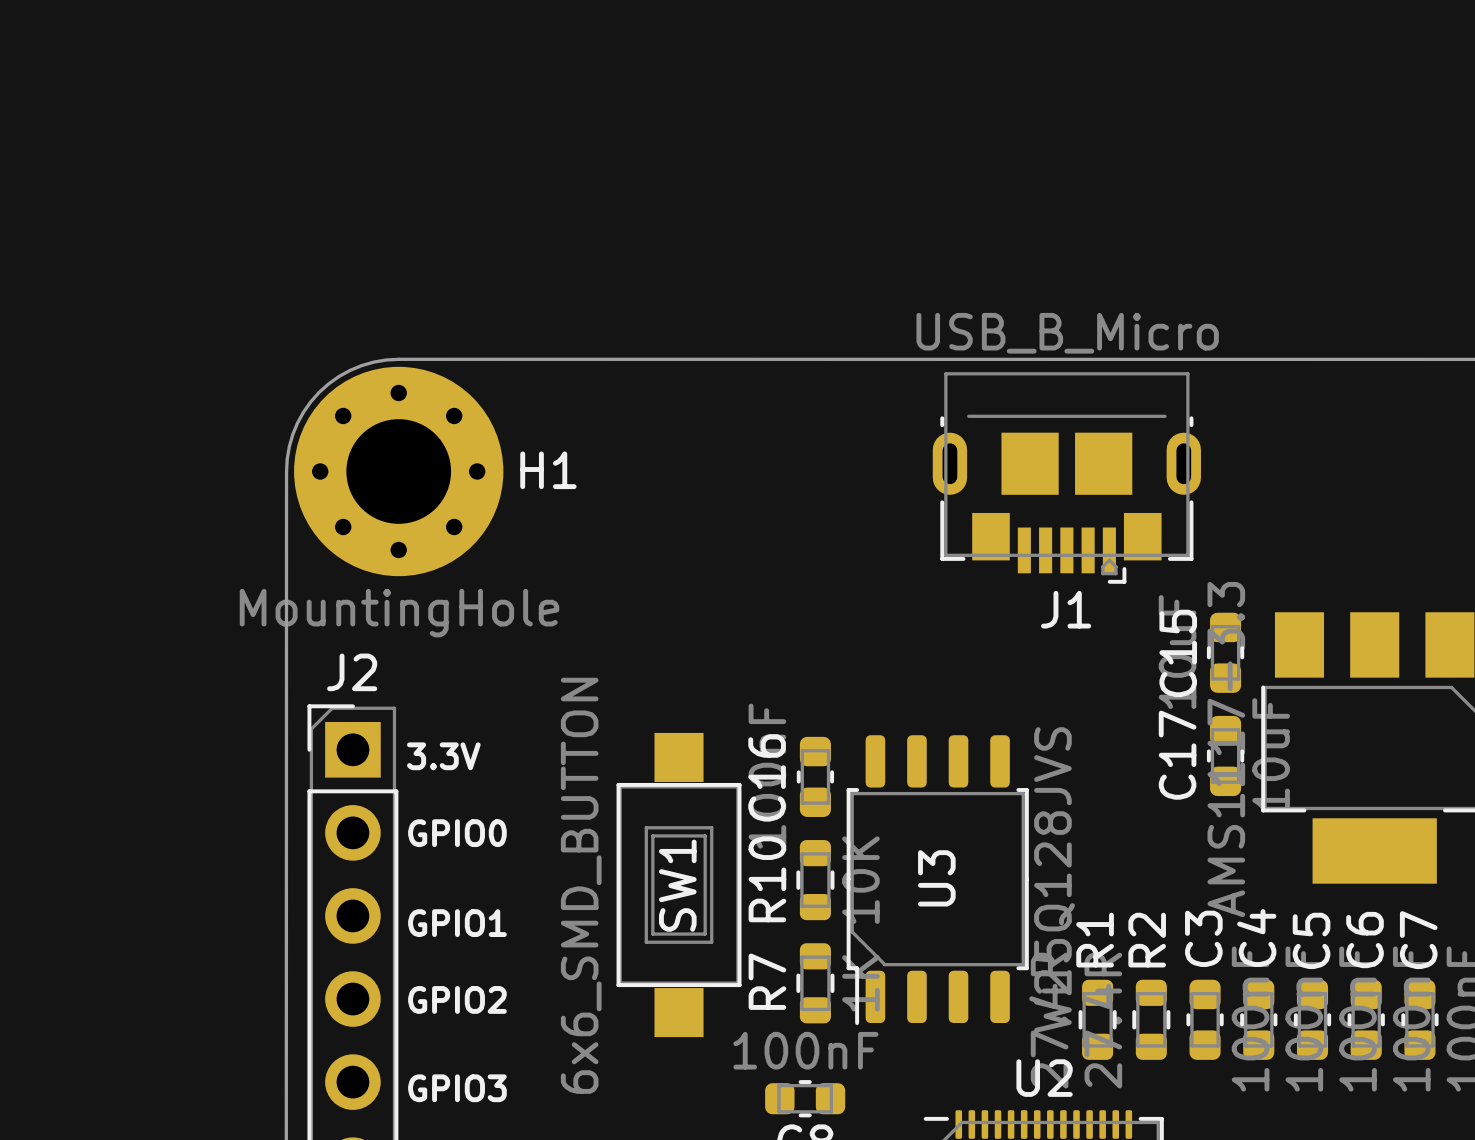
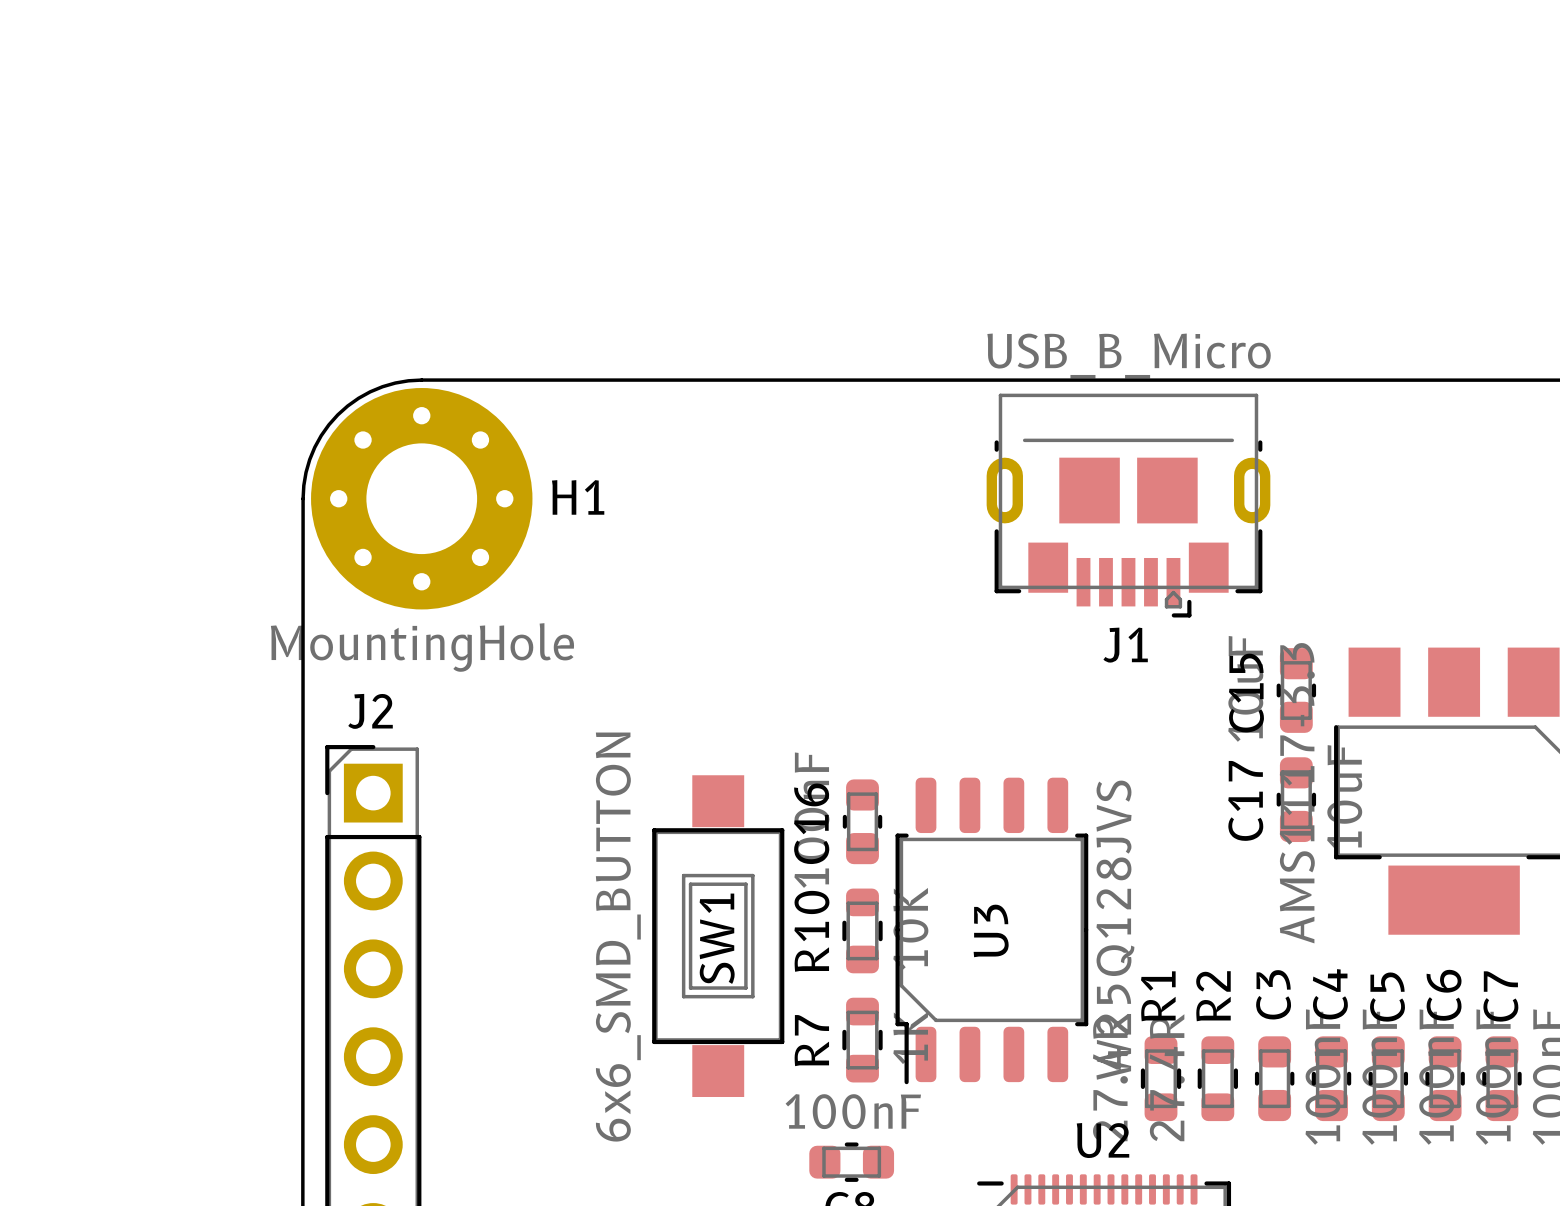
text: 3.3V (443, 756) -> none
text: GPIO0 (457, 833) -> none
text: GPIO1 (457, 923) -> none
text: GPIO2 (457, 999) -> none
text: GPIO3 (457, 1088) -> none

